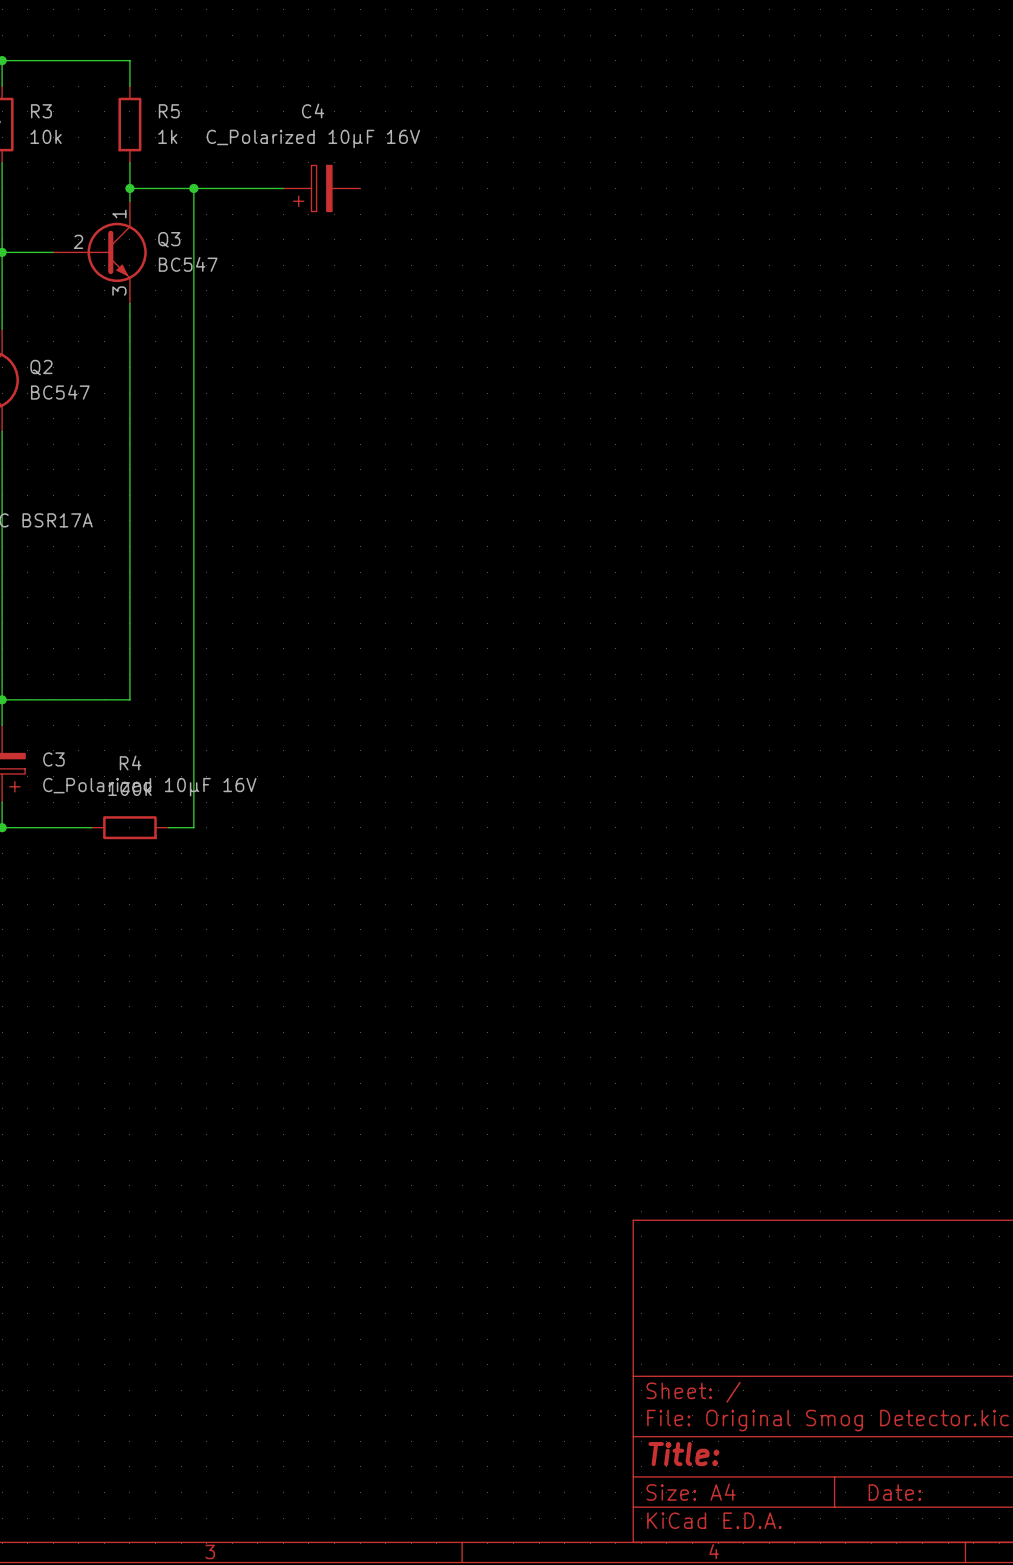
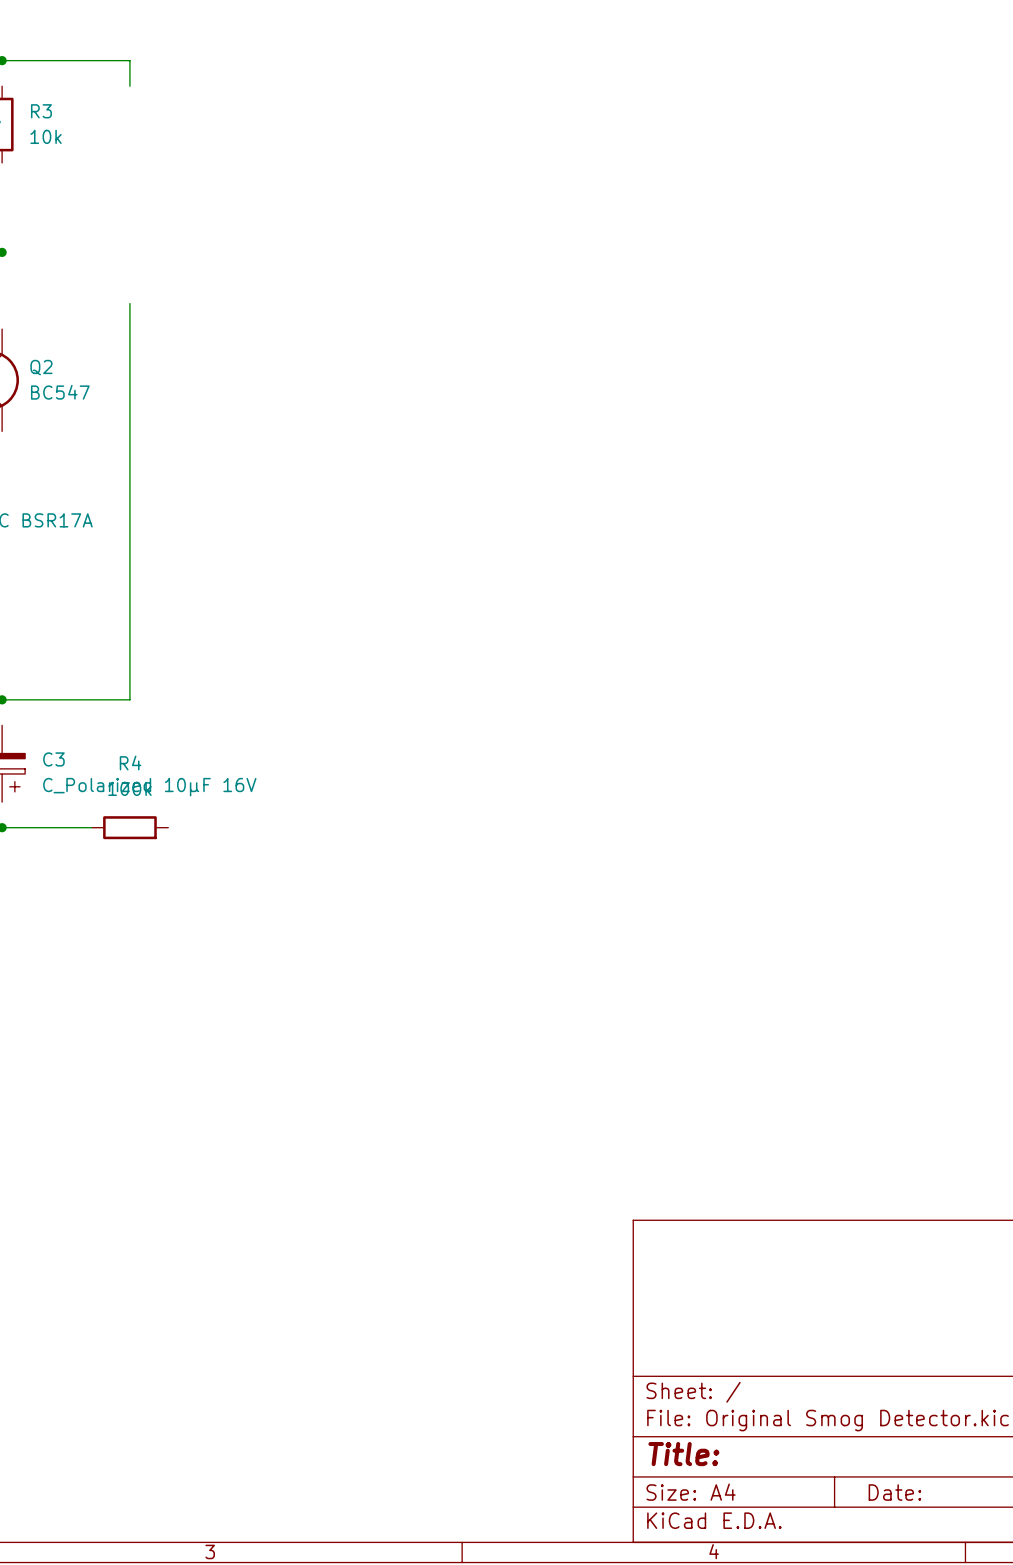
wire: (2, 60) (2, 86) -> none
R5: 1k (129, 124) -> none
wire: (2, 162) (2, 329) -> none
wire: (129, 162) (129, 201) -> none
wire: (129, 188) (283, 188) -> none
junction: (129, 188) -> none
wire: (193, 188) (193, 827) (168, 827) -> none
junction: (193, 188) -> none
C4: C_Polarized 10µF 16V (321, 188) -> none
wire: (2, 252) (53, 252) -> none
Q3: BC547 (100, 252) -> none
wire: (2, 431) (2, 725) -> none
wire: (2, 802) (2, 827) -> none

